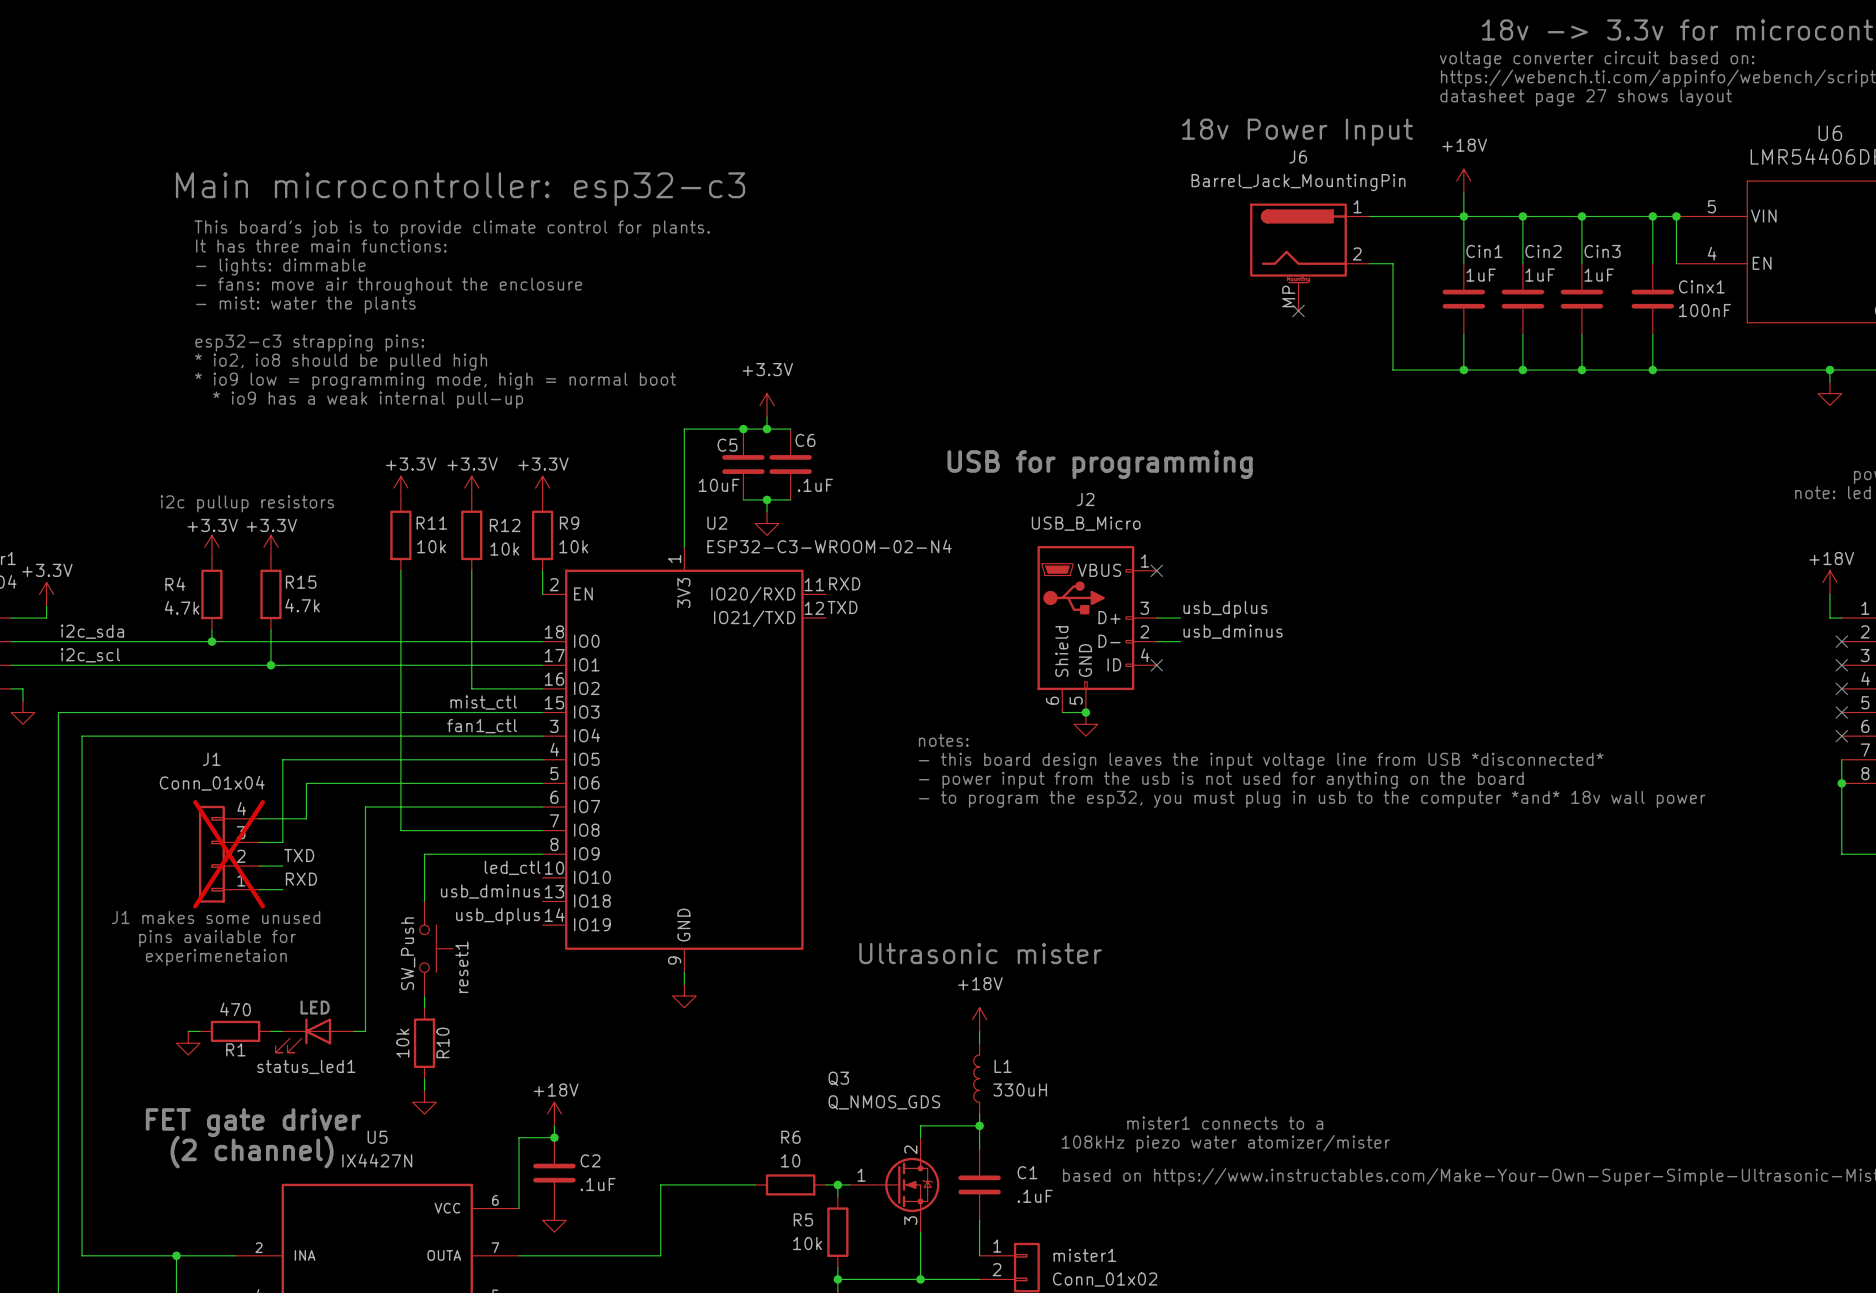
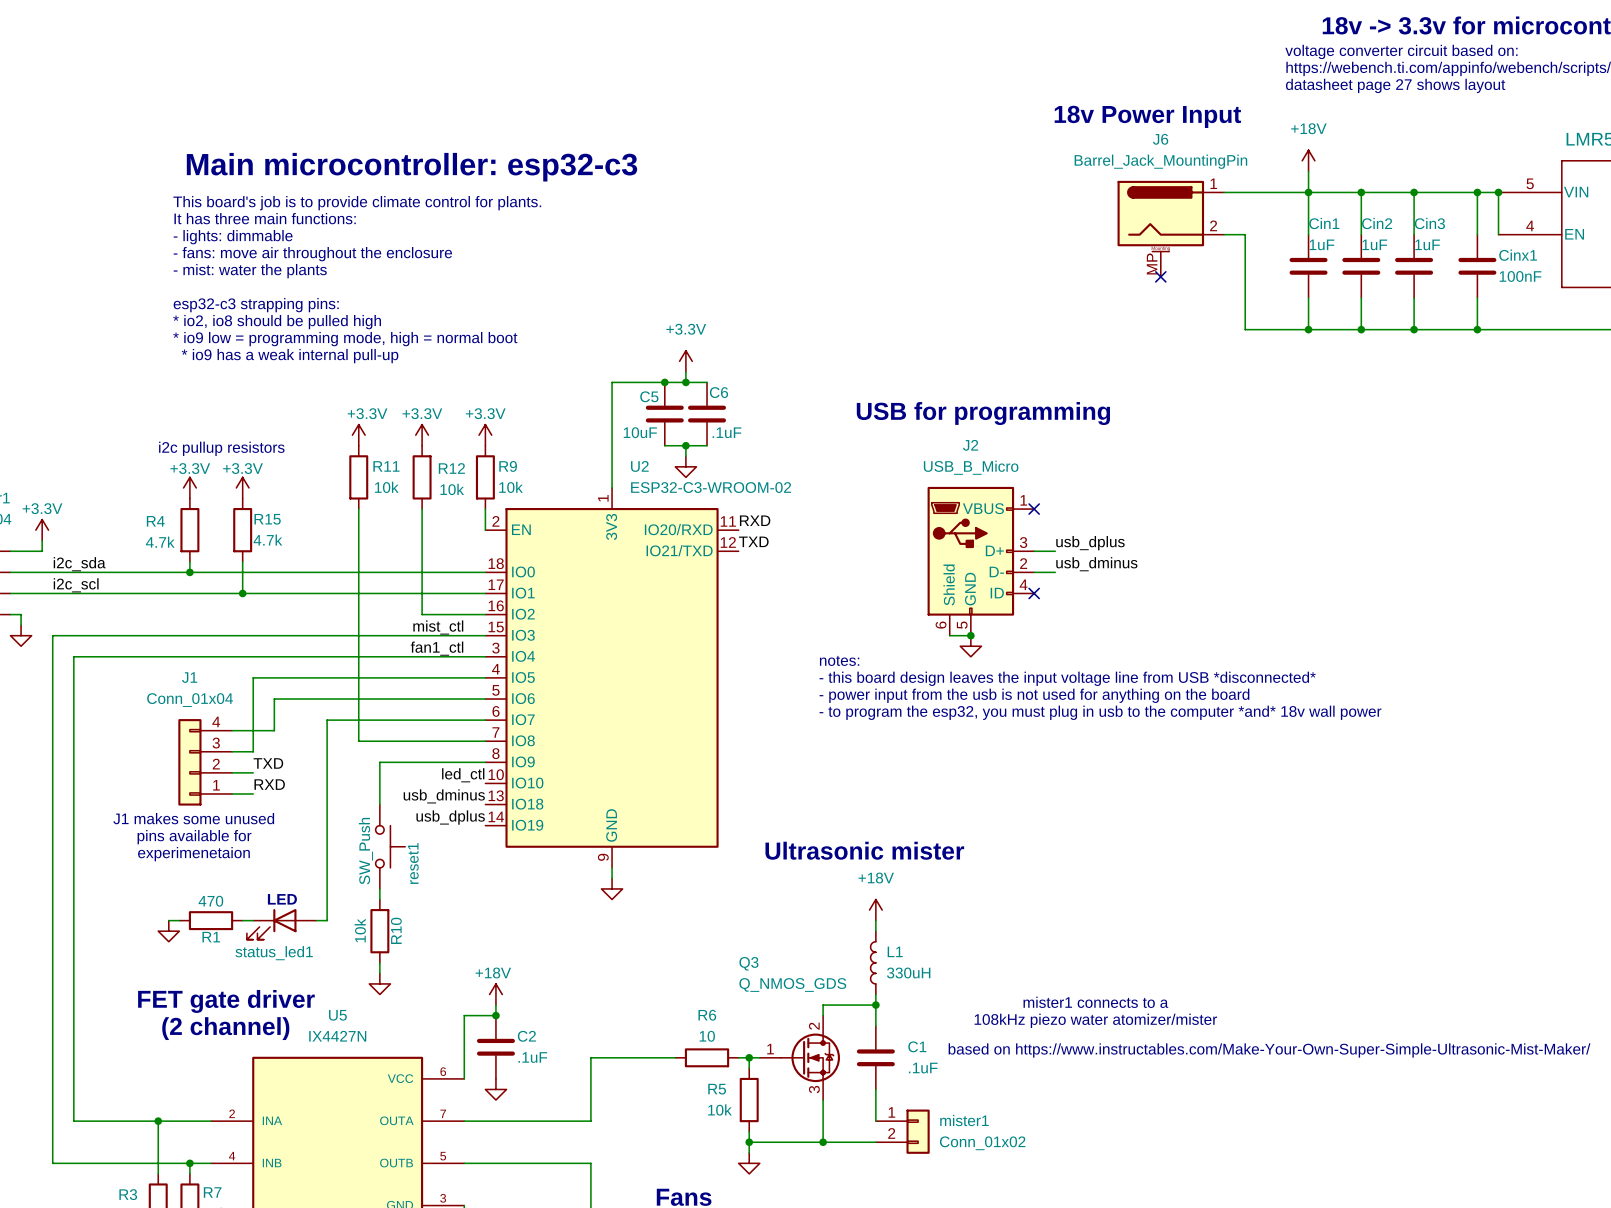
U2 value: ESP32-C3-WROOM-02-N4 (829, 546) -> ESP32-C3-WROOM-02 (711, 487)
J1 do-not-place cross: (229, 854) -> none

